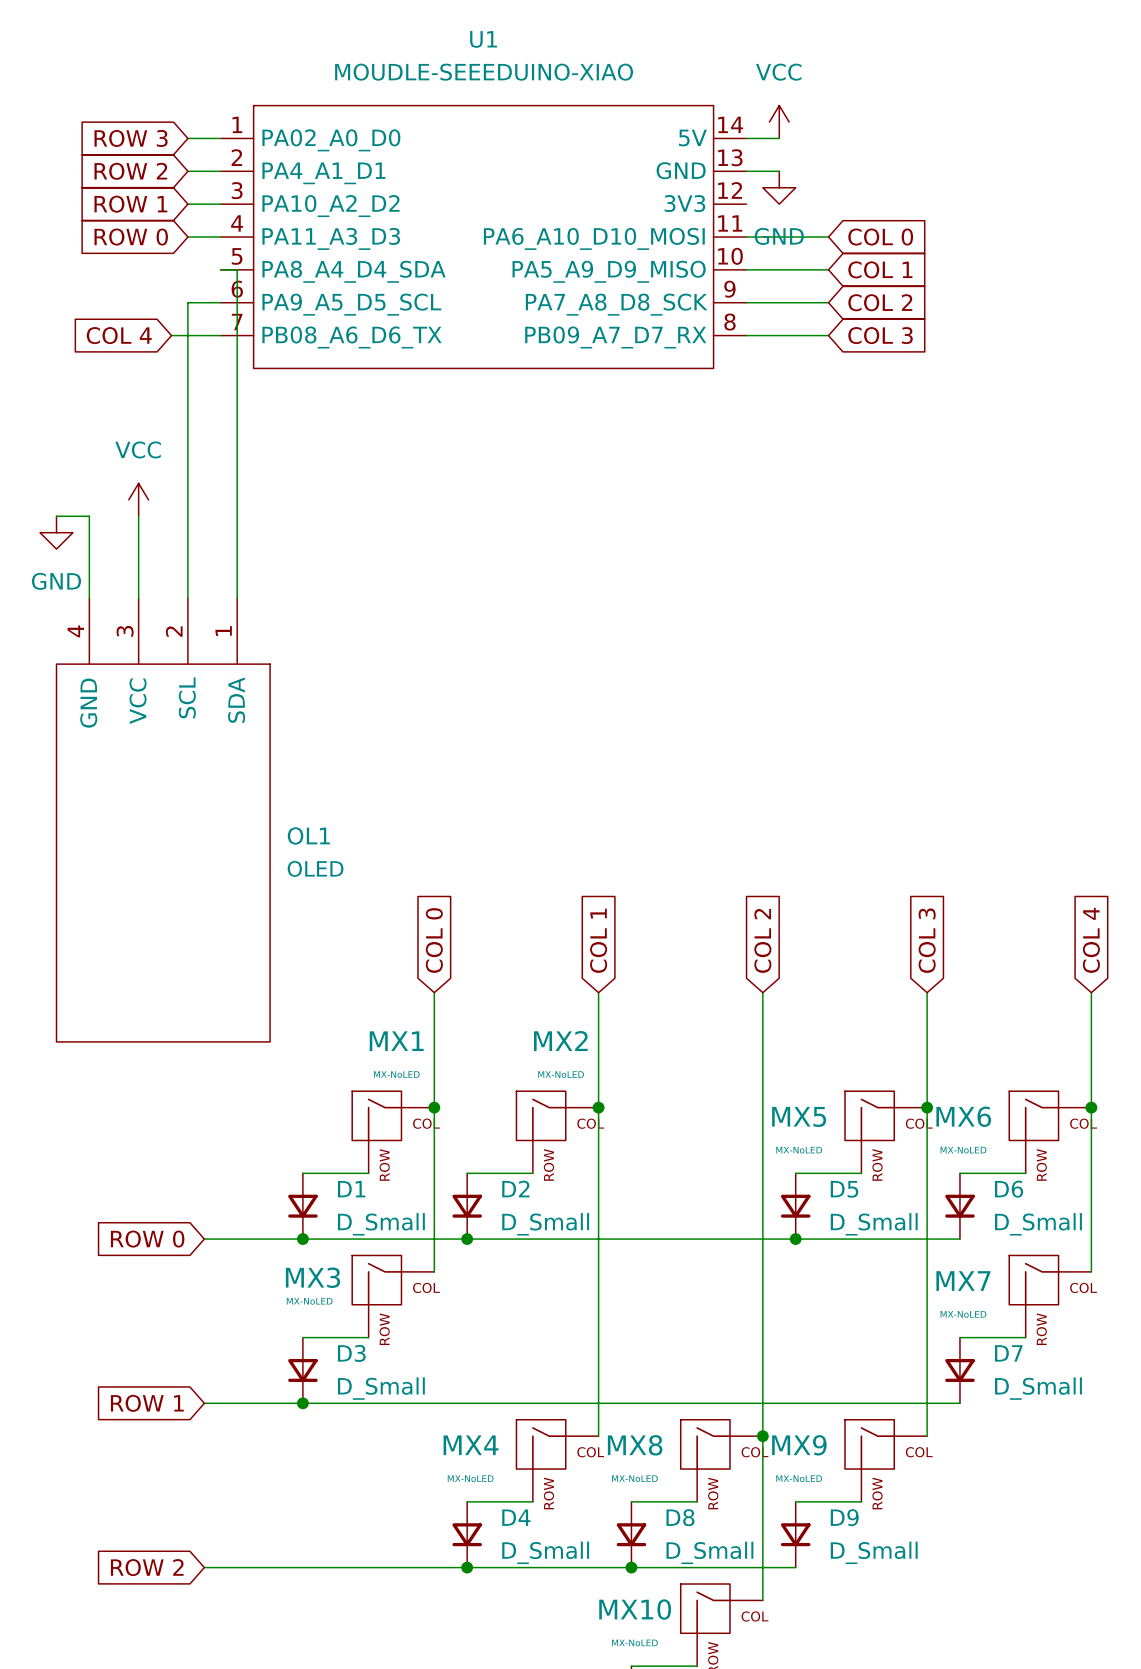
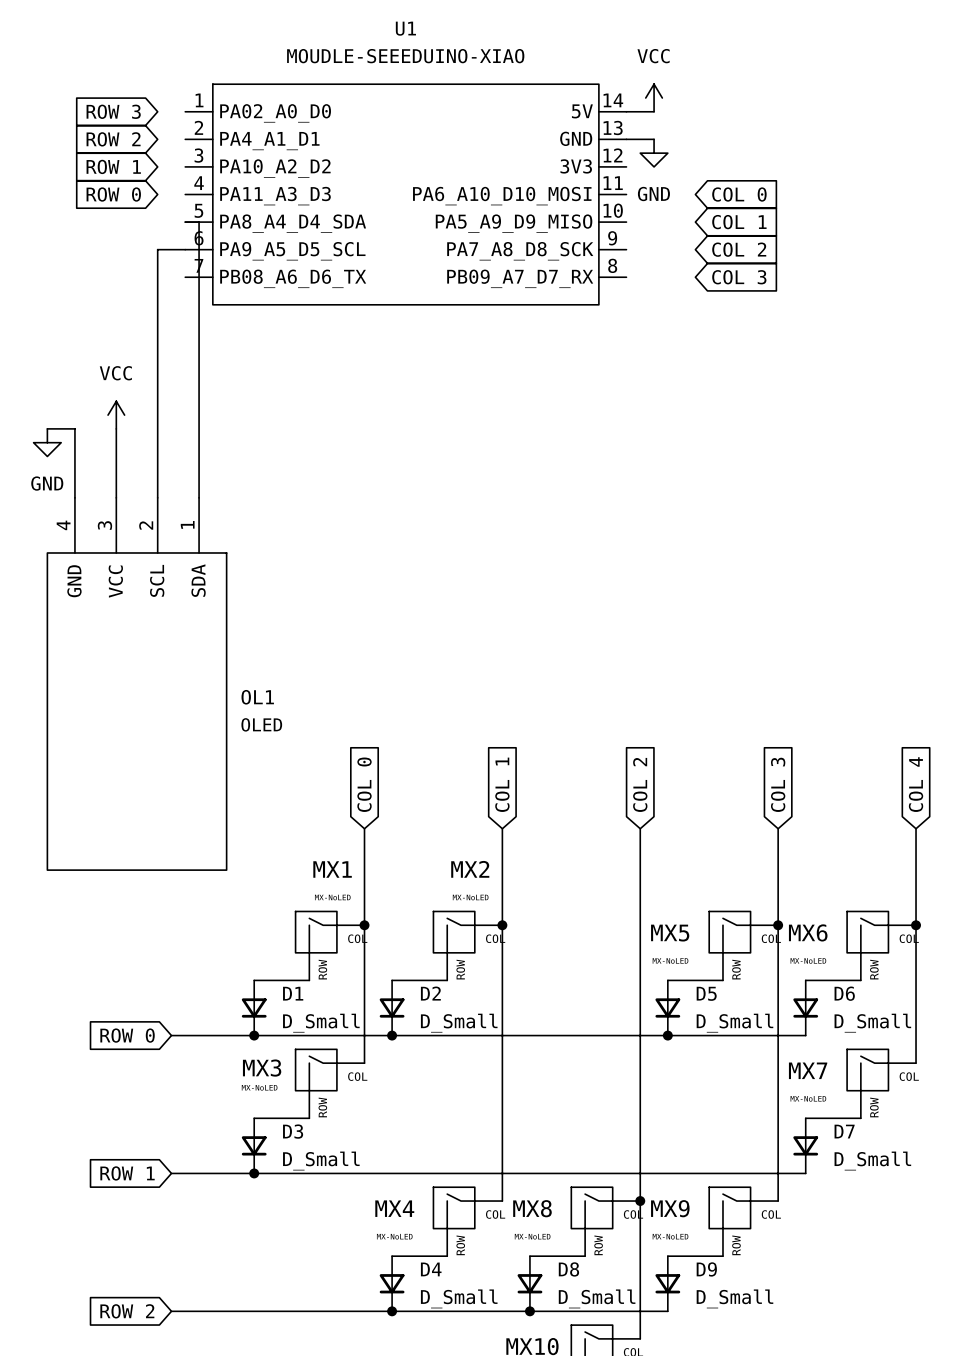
wire: (187, 138) (220, 138) -> none
wire: (187, 171) (220, 171) -> none
wire: (187, 204) (220, 204) -> none
wire: (187, 237) (220, 237) -> none
wire: (746, 237) (828, 237) -> none
wire: (746, 269) (828, 269) -> none
wire: (746, 302) (828, 302) -> none
global label: COL 4 (119, 335) -> none
wire: (171, 335) (220, 335) -> none
wire: (746, 335) (828, 335) -> none

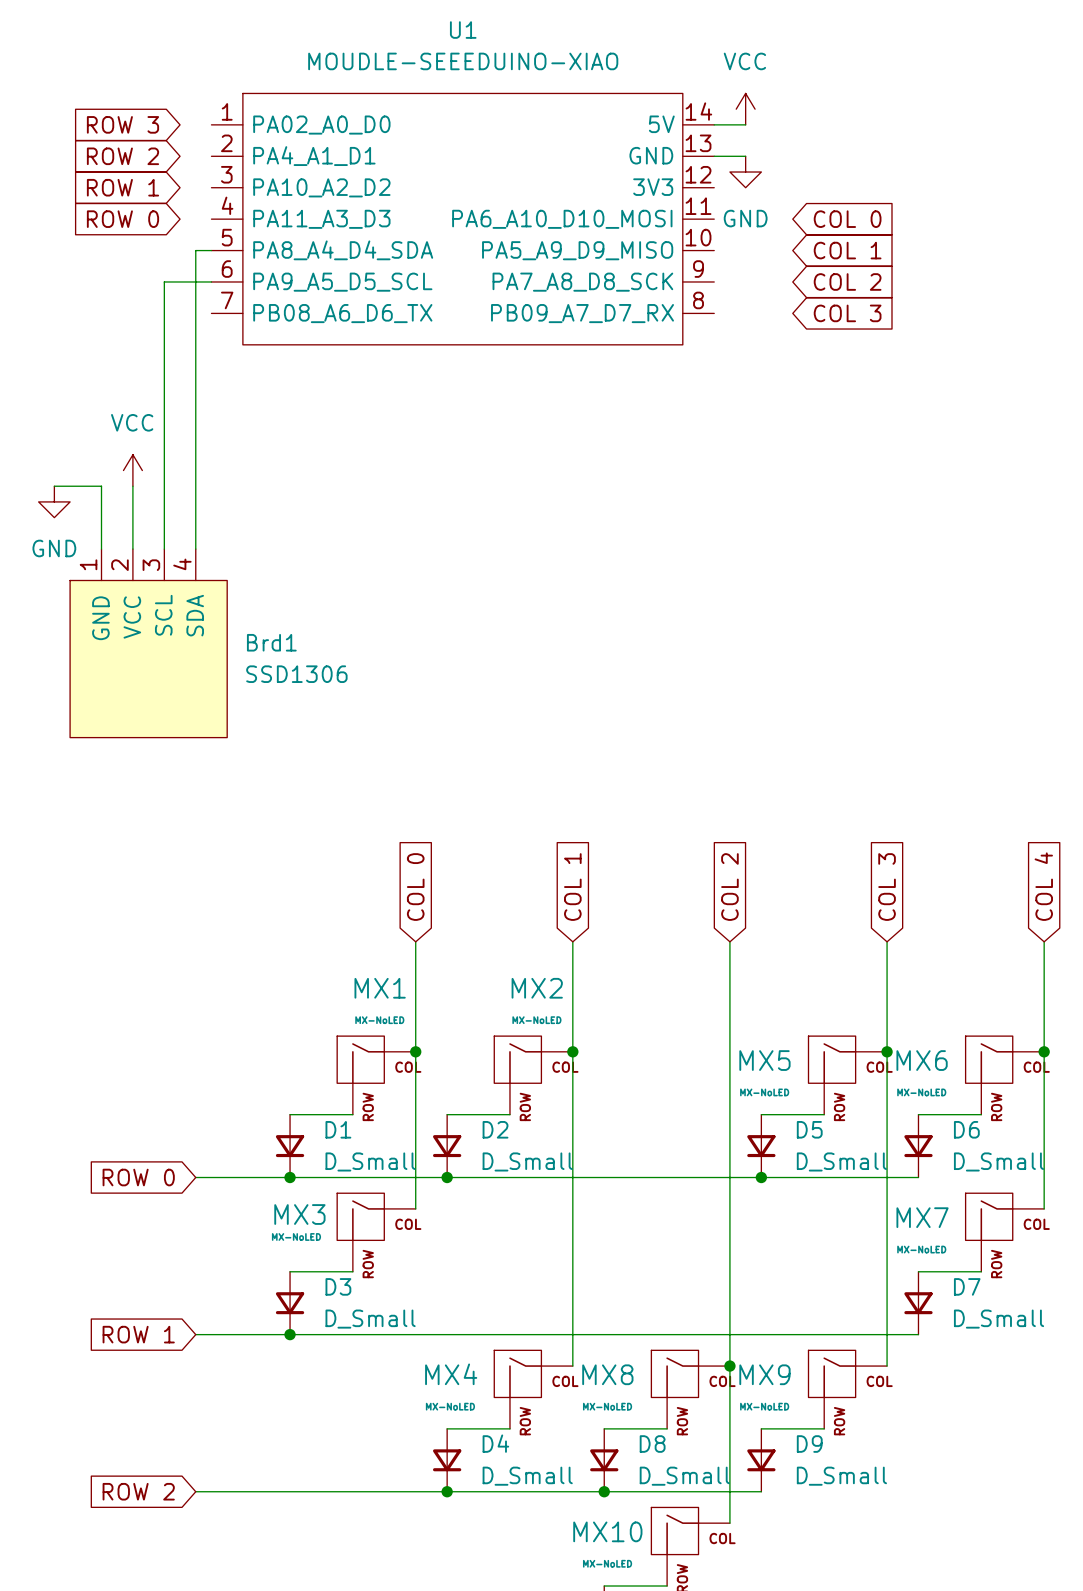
wire: (185, 222) (199, 222) (199, 497) -> (211, 250) (195, 250) (195, 549)
wire: (157, 249) (157, 497) -> (180, 281) (164, 281) (164, 549)
wire: (74, 428) (74, 497) -> (85, 486) (101, 486) (101, 549)
Brd1: none -> SSD1306 (148, 643)
OL1: OLED (137, 683) -> none

